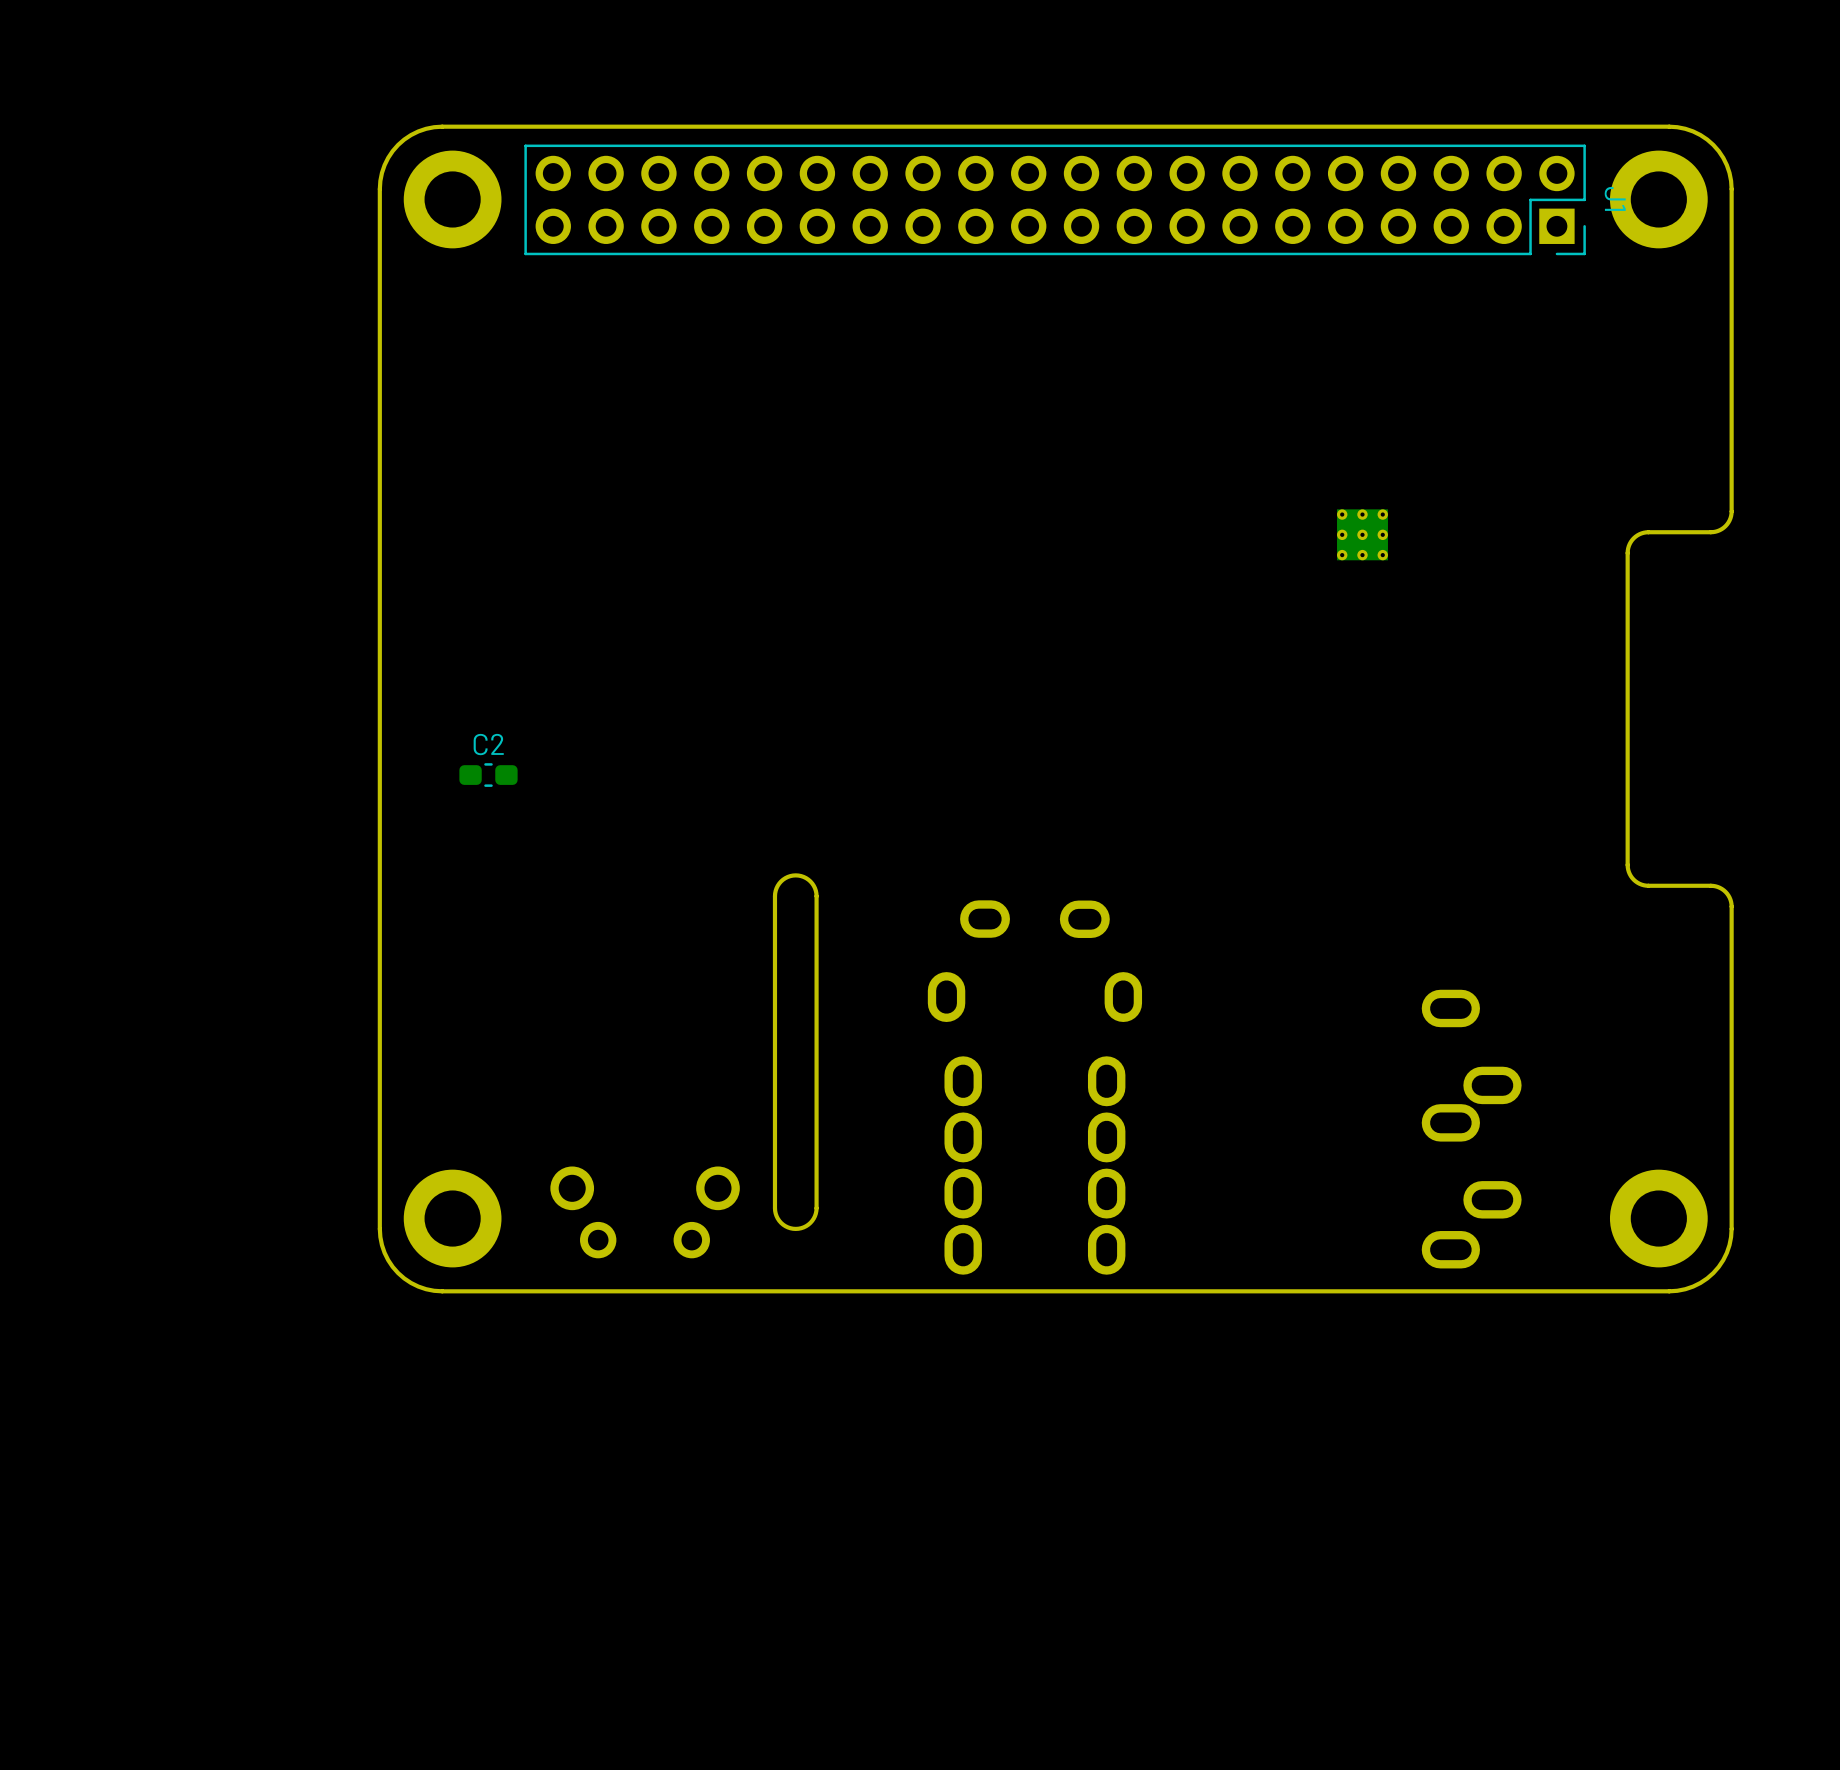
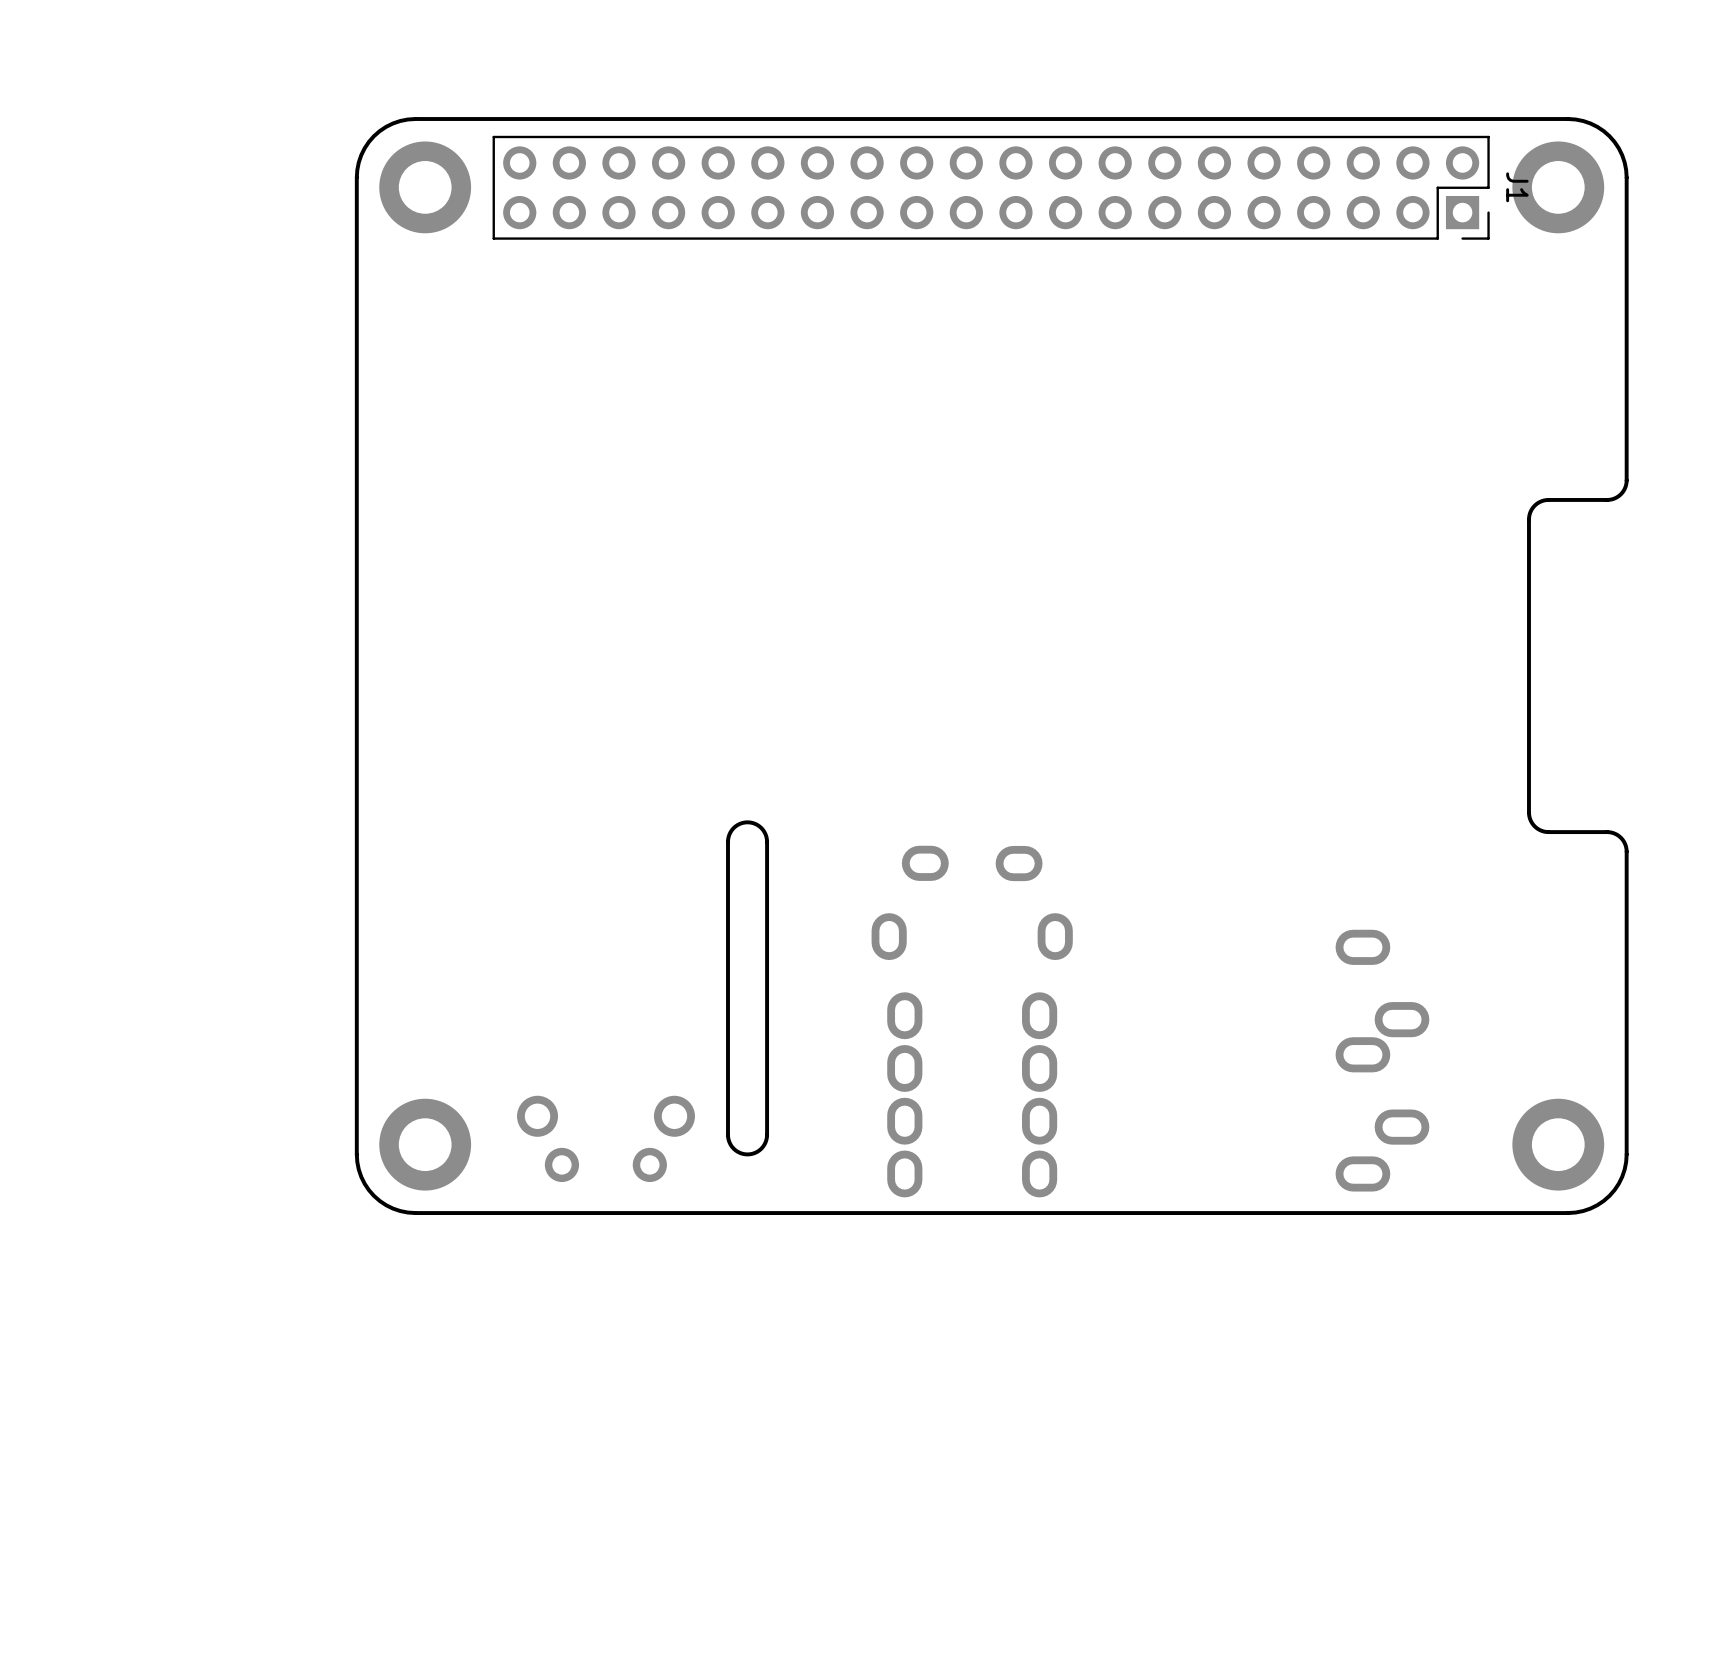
part: (1362, 534) -> none
C2: (488, 775) -> none

